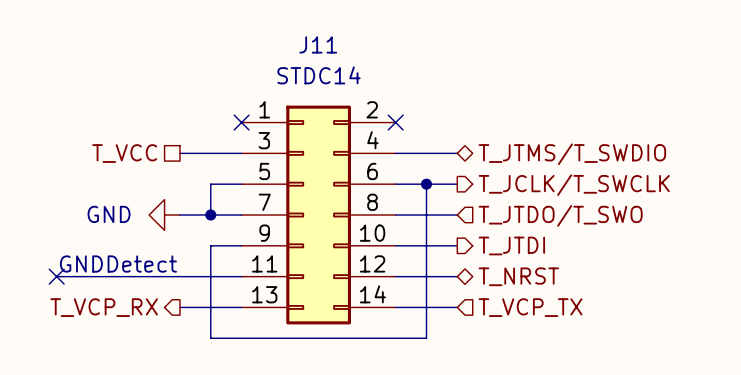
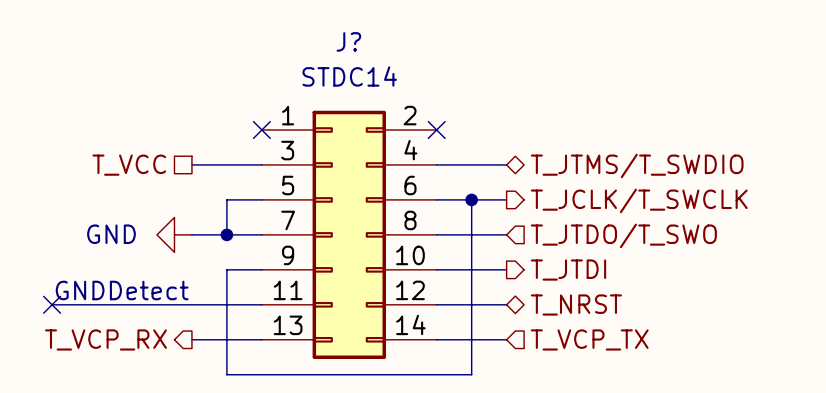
J11 name: J11 (318, 44) -> J? (348, 41)

